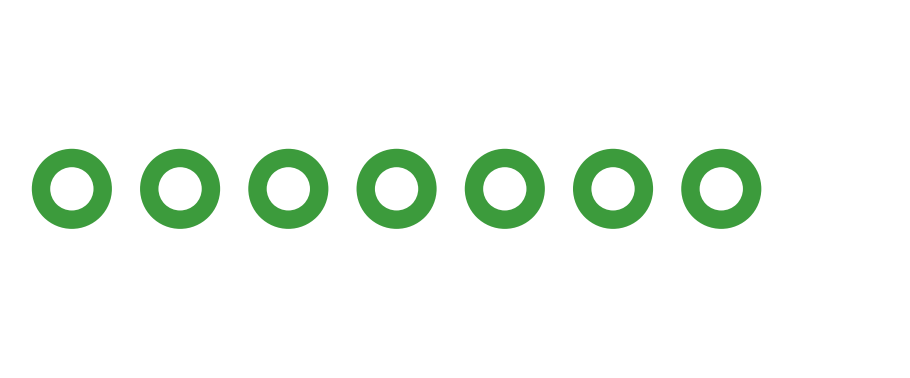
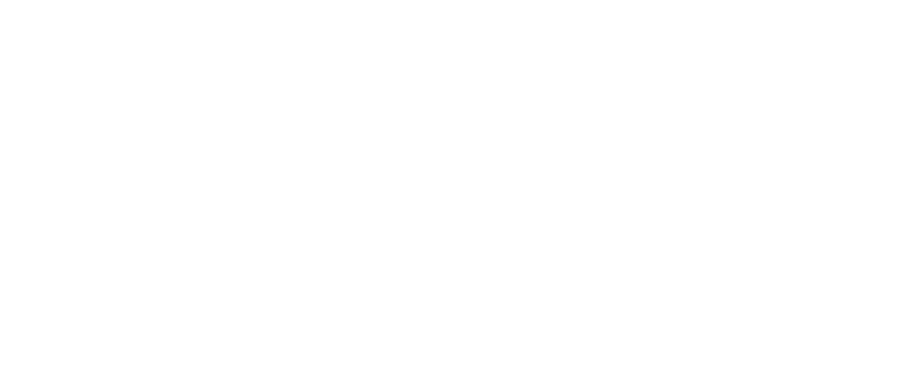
part: (396, 188) -> none

